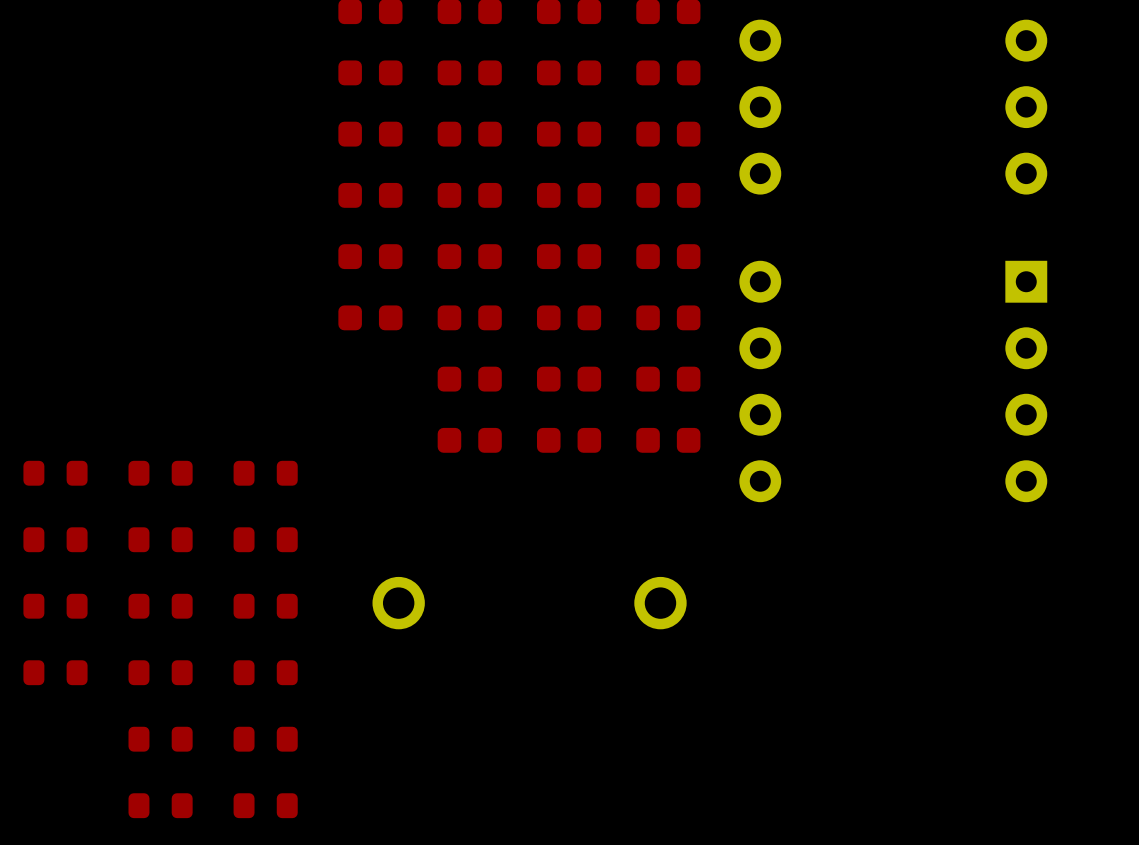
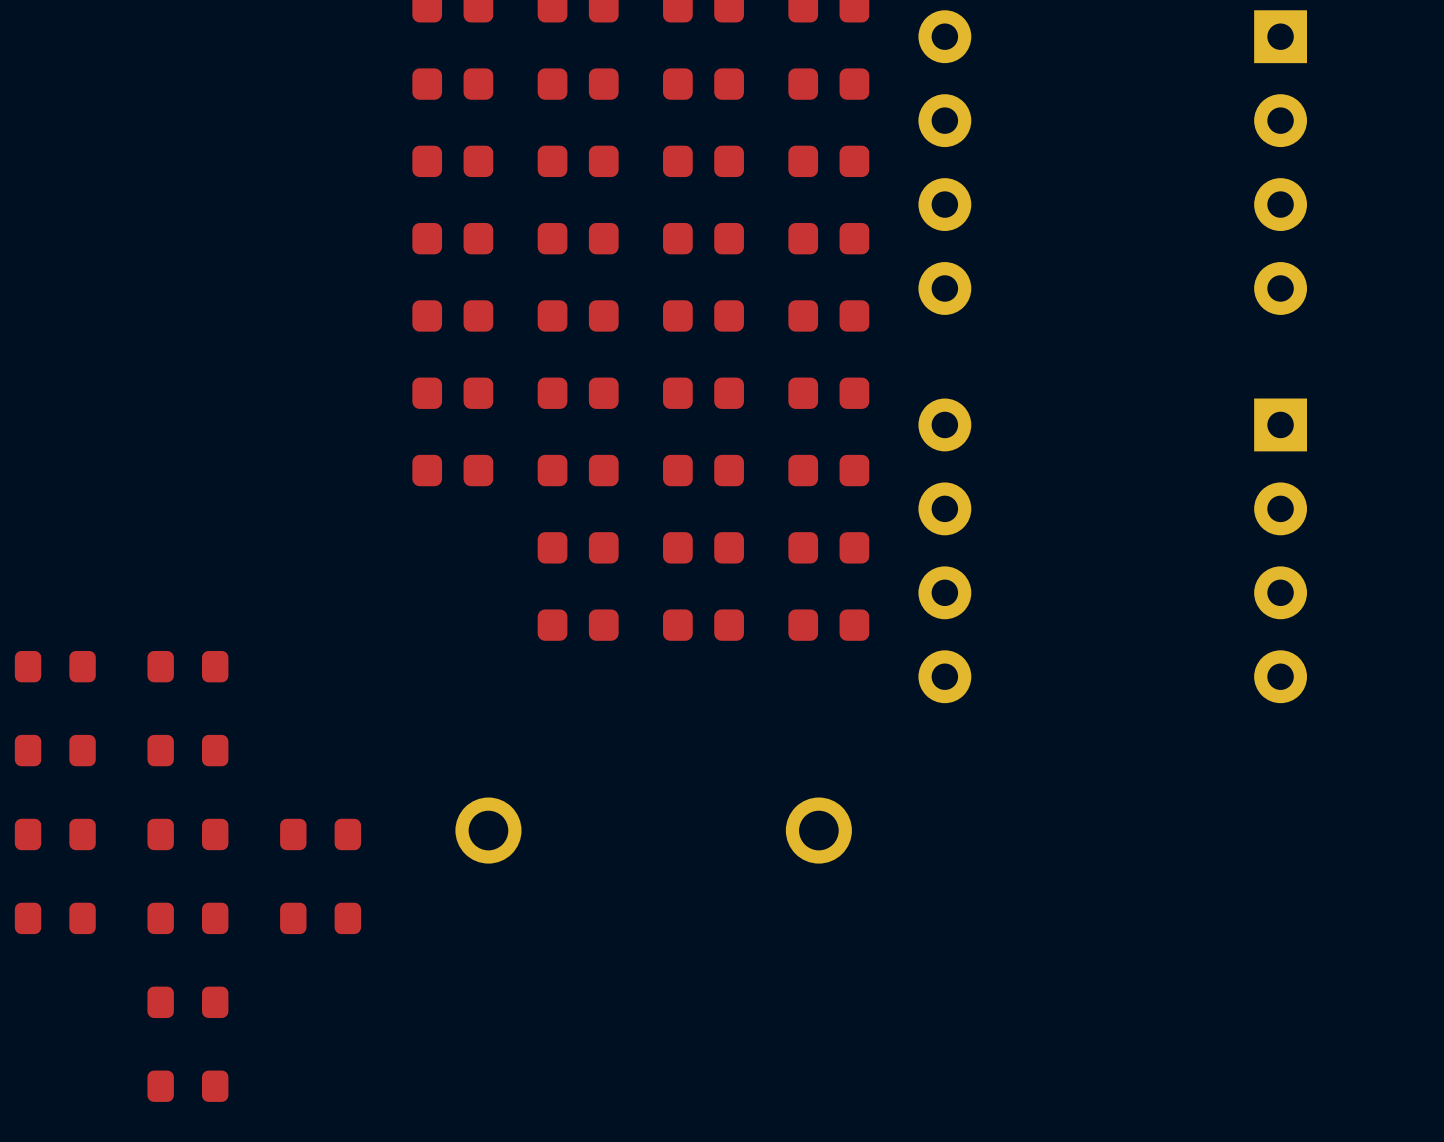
part: (265, 473) -> none
part: (265, 539) -> none
part: (265, 739) -> none
part: (265, 805) -> none

